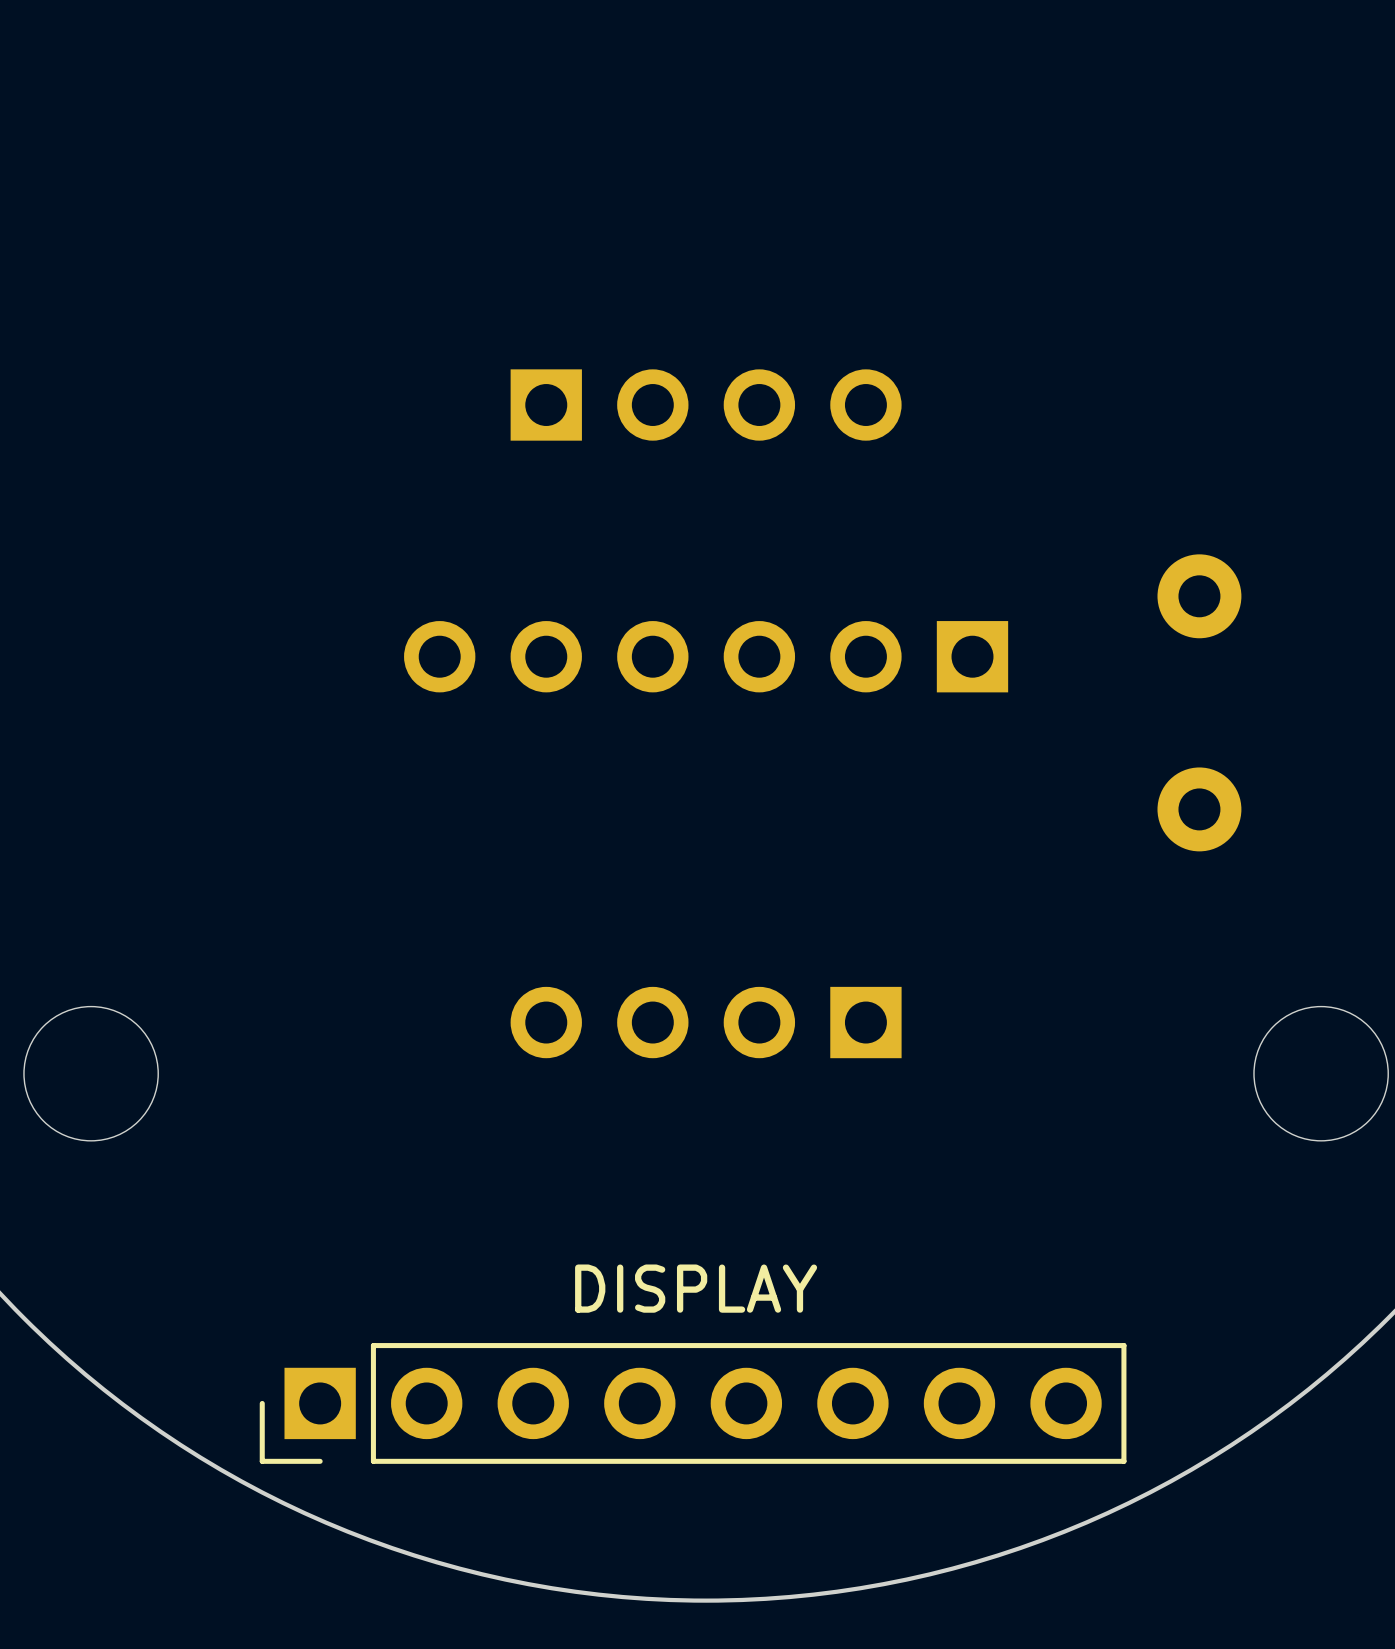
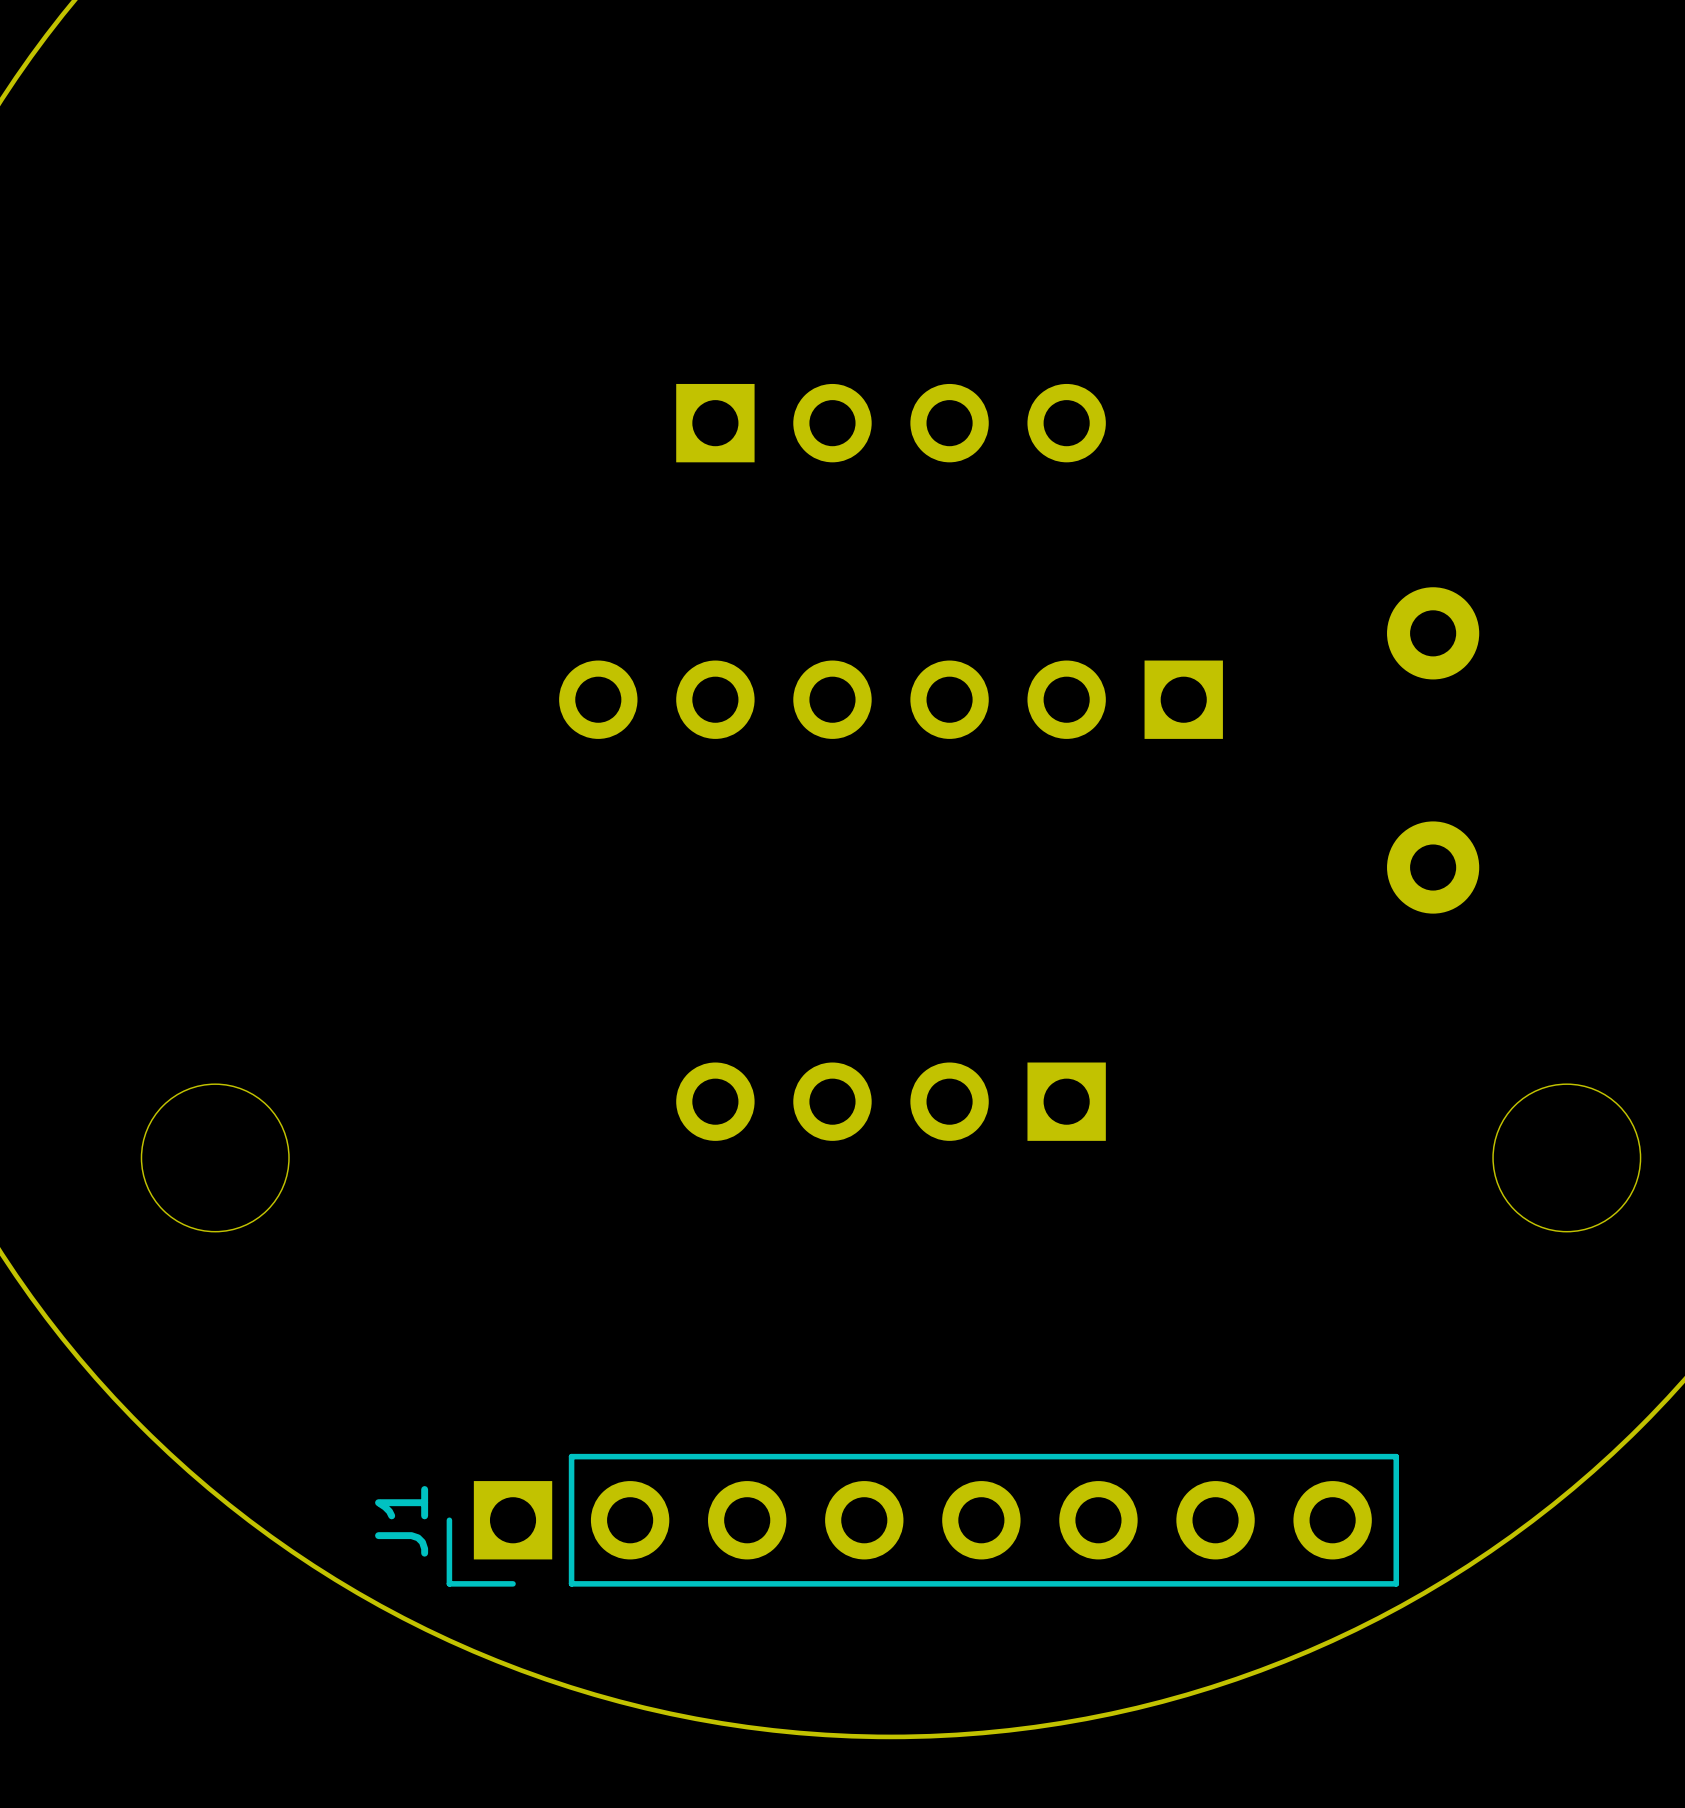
J1 text: DISPLAY (696, 1288) -> none
J1 position: (693, 1403) -> (922, 1520)
J1 name: none -> J1 (401, 1521)

